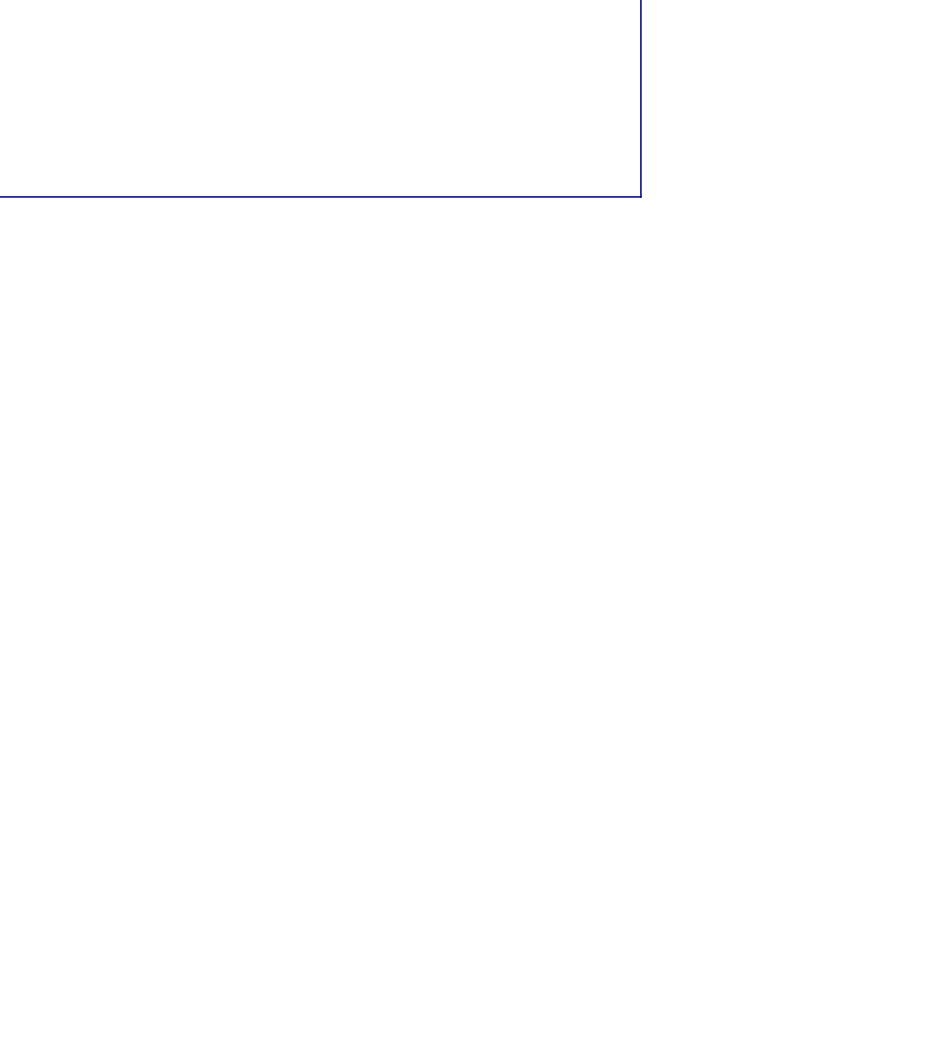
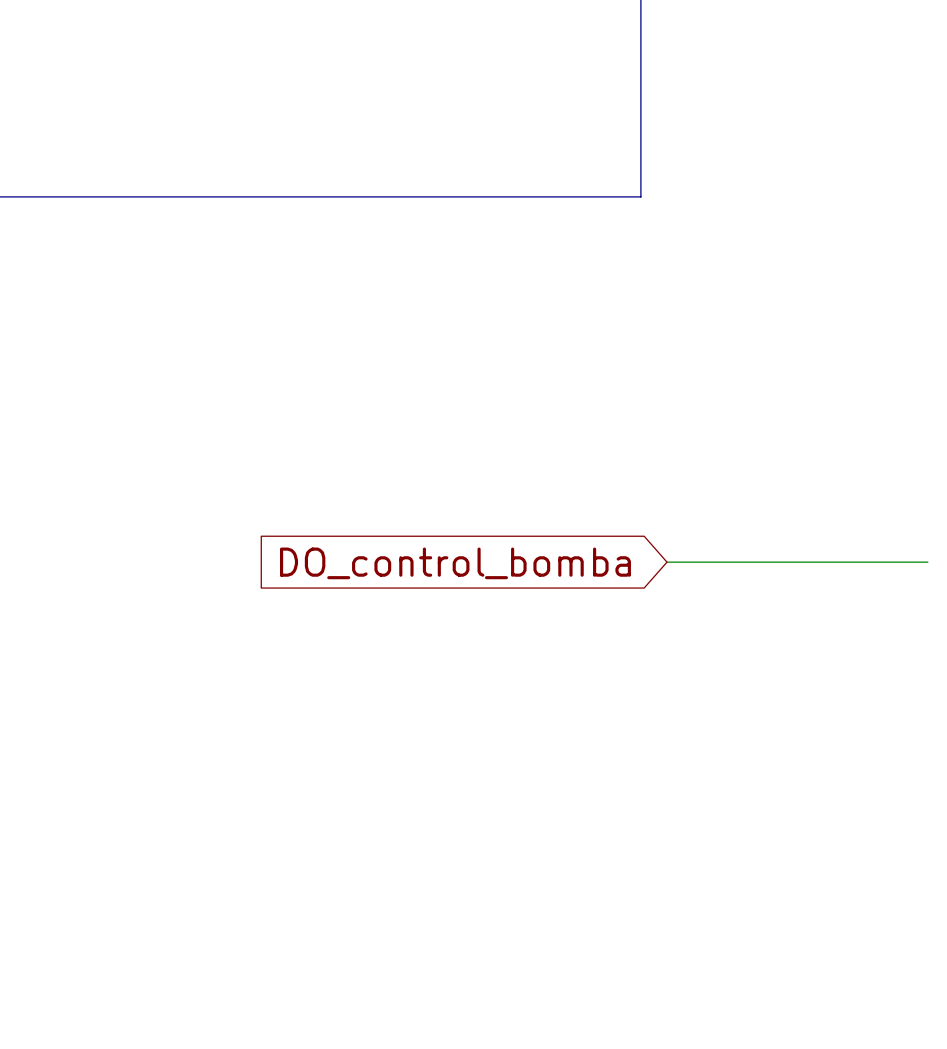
wire: none -> (667, 562) (927, 562)
global label: none -> DO_control_bomba (455, 563)

